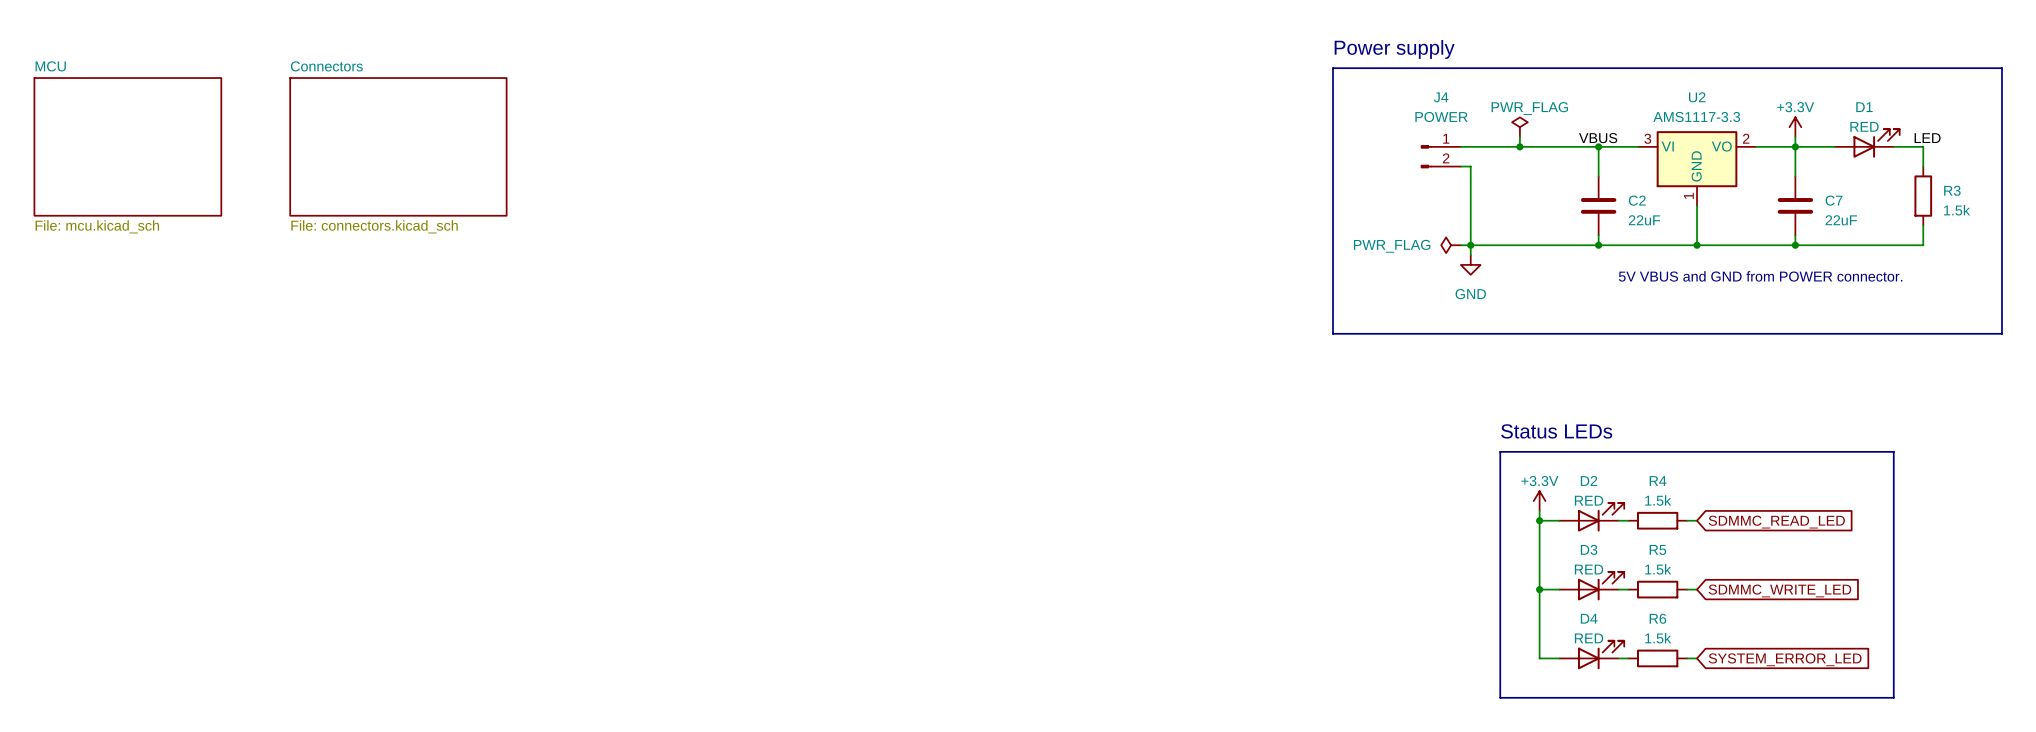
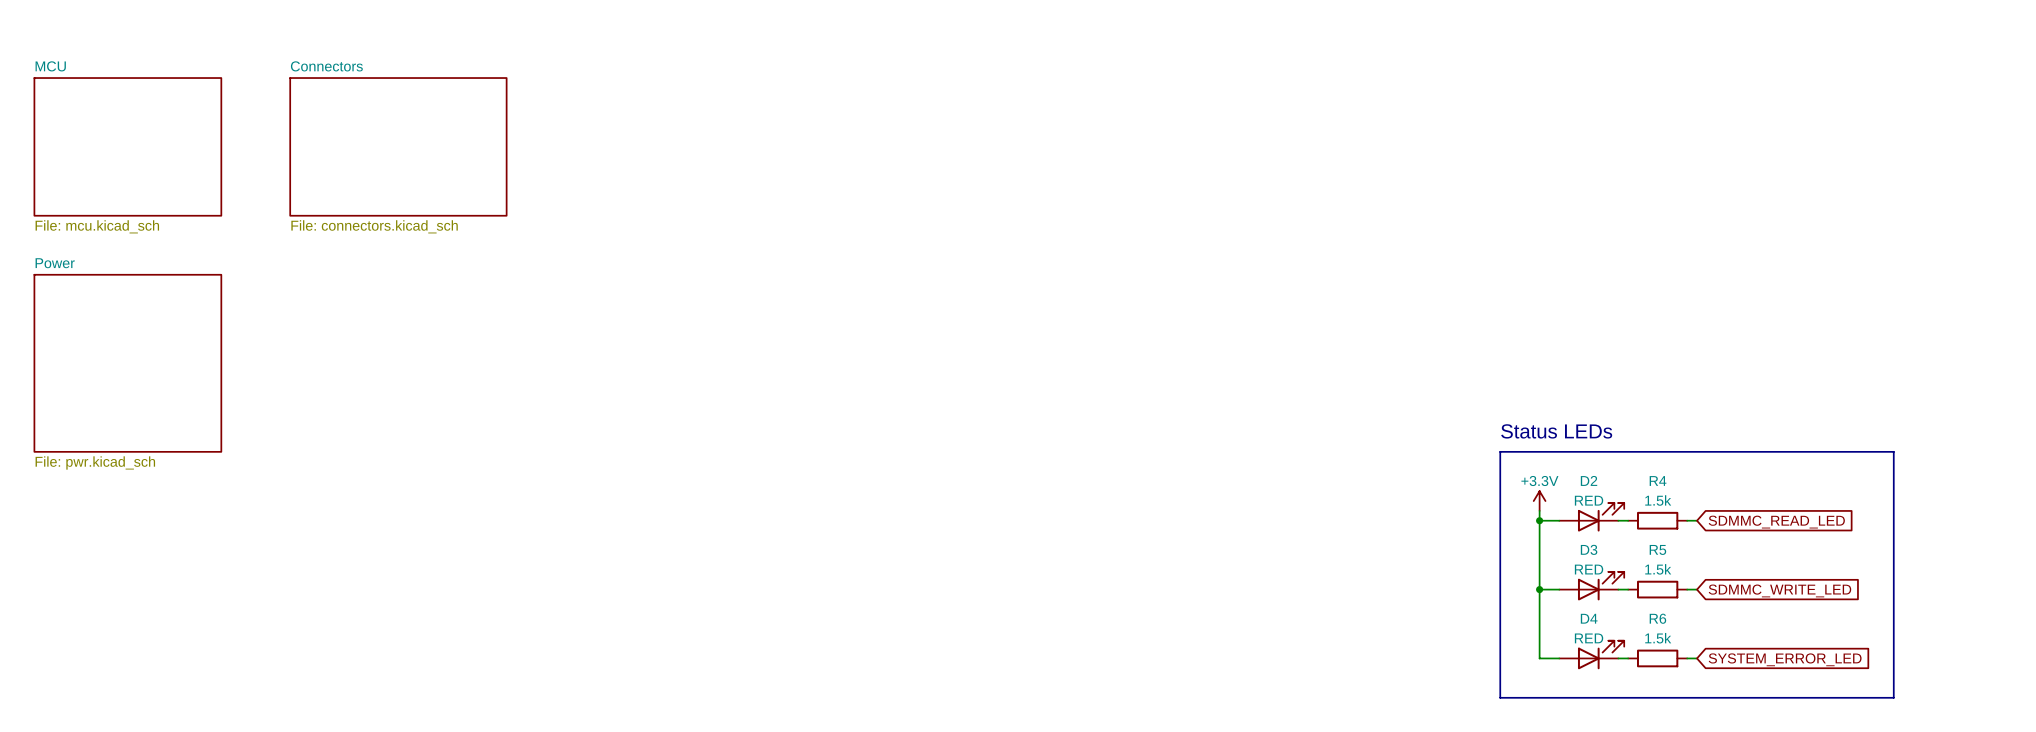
text: Power supply (1394, 49) -> none
line: (1333, 68) (2001, 68) (2001, 333) (1333, 333) (1333, 68) -> none
power symbol: PWR_FLAG (1519, 127) -> none
power symbol: +3.3V (1795, 127) -> none
wire: (1519, 137) (1519, 146) -> none
wire: (1795, 137) (1795, 176) -> none
label: VBUS (1598, 138) -> none
label: LED (1927, 138) -> none
D1: RED (1867, 143) -> none
wire: (1460, 146) (1637, 146) -> none
junction: (1519, 146) -> none
wire: (1598, 146) (1598, 176) -> none
junction: (1598, 146) -> none
wire: (1756, 146) (1834, 146) -> none
junction: (1795, 146) -> none
wire: (1893, 146) (1923, 146) (1923, 166) -> none
J4: POWER (1440, 156) -> none
wire: (1460, 166) (1470, 166) (1470, 255) -> none
U2: AMS1117-3.3 (1697, 168) -> none
R3: 1.5k (1923, 196) -> none
C2: 22uF (1598, 205) -> none
wire: (1697, 205) (1697, 245) -> none
C7: 22uF (1795, 205) -> none
wire: (1923, 225) (1923, 245) (1460, 245) -> none
wire: (1598, 235) (1598, 245) -> none
wire: (1795, 235) (1795, 245) -> none
power symbol: PWR_FLAG (1451, 245) -> none
junction: (1470, 245) -> none
junction: (1598, 245) -> none
junction: (1697, 245) -> none
junction: (1795, 245) -> none
power symbol: GND (1470, 264) -> none
text: 5V VBUS and GND from POWER connector. (1760, 276) -> none
sheet Power: none -> File: pwr.kicad_sch (127, 363)

